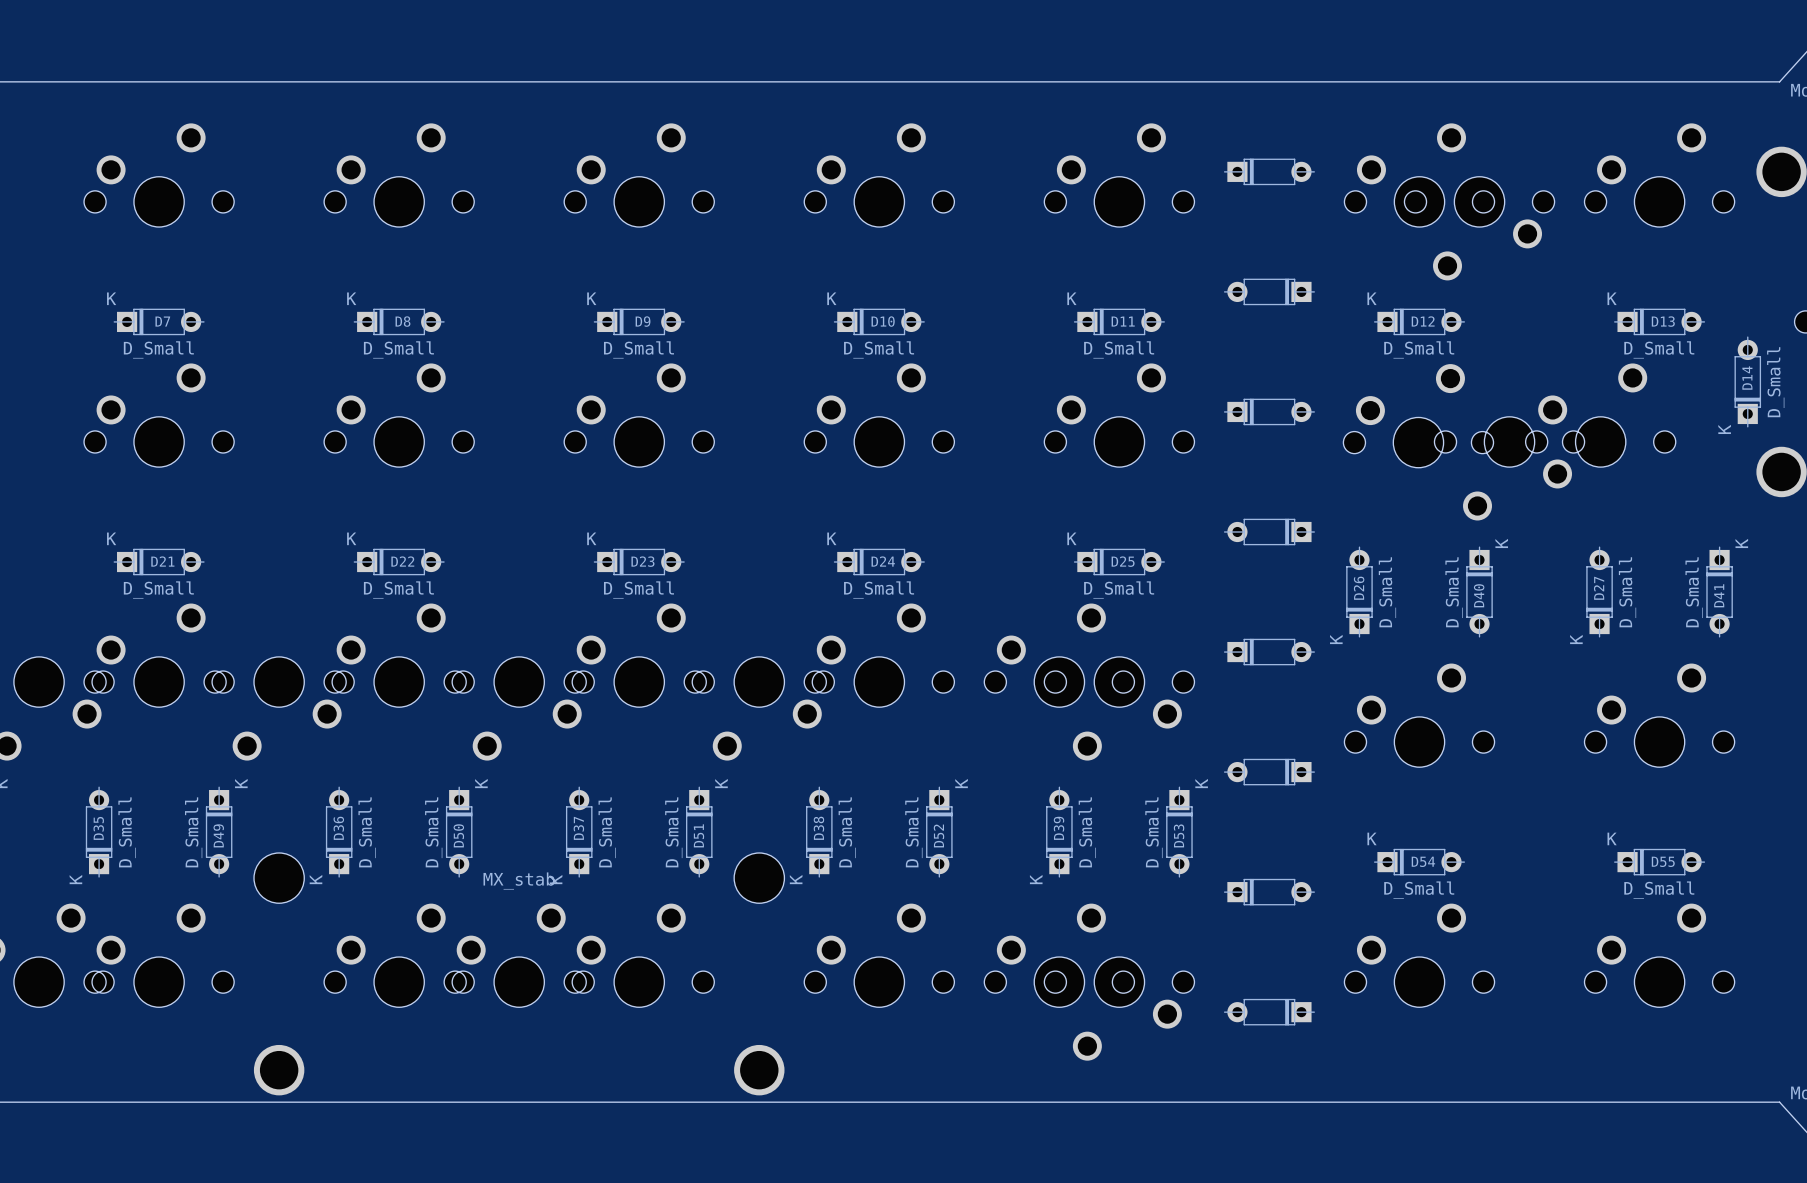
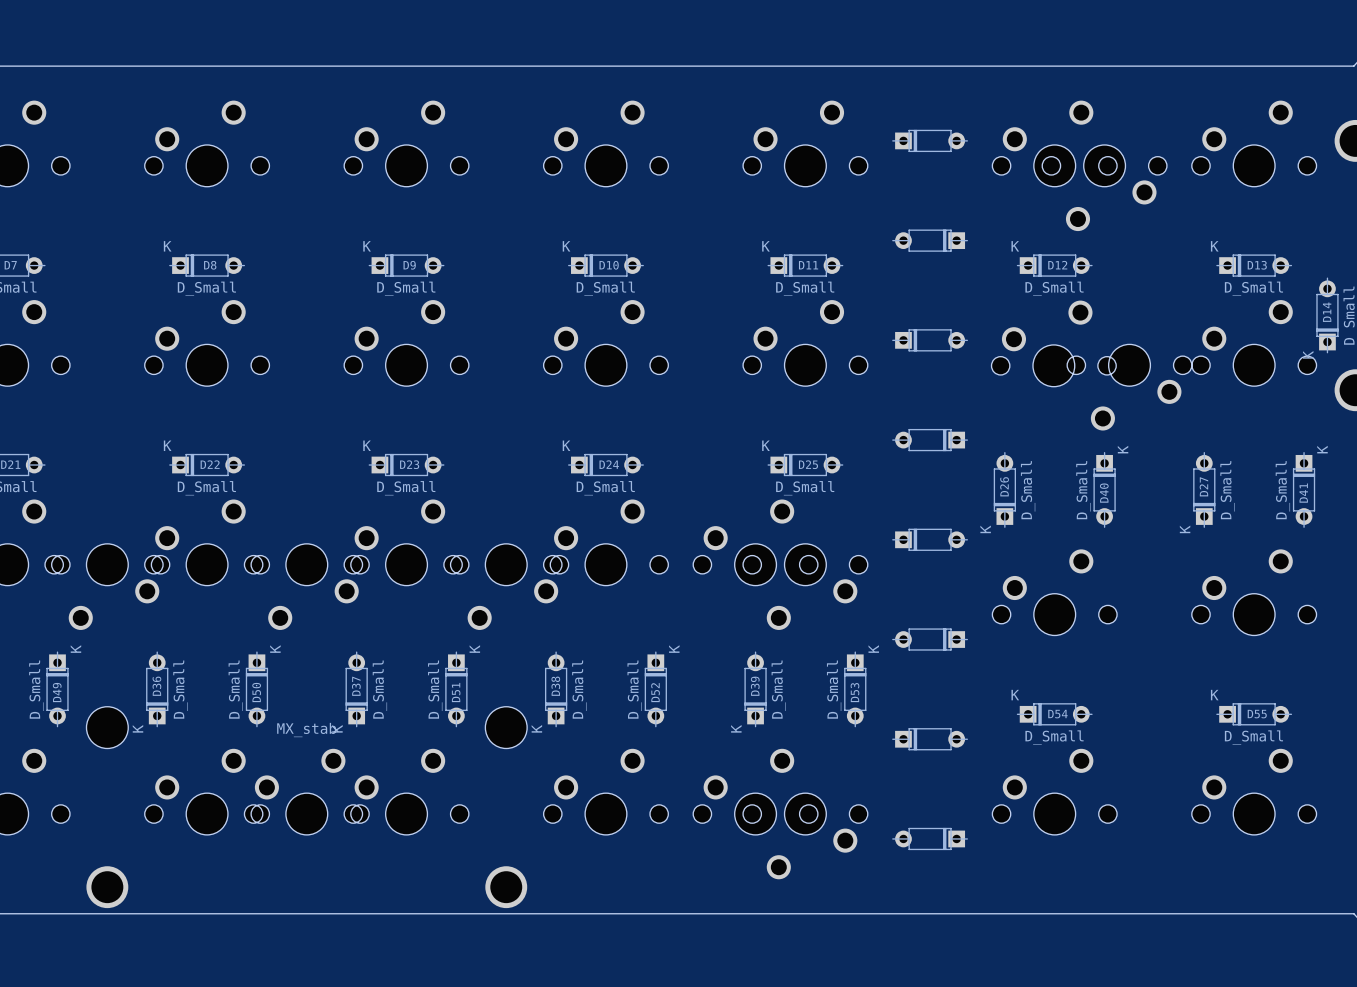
part position: (1600, 415) -> (1254, 343)

